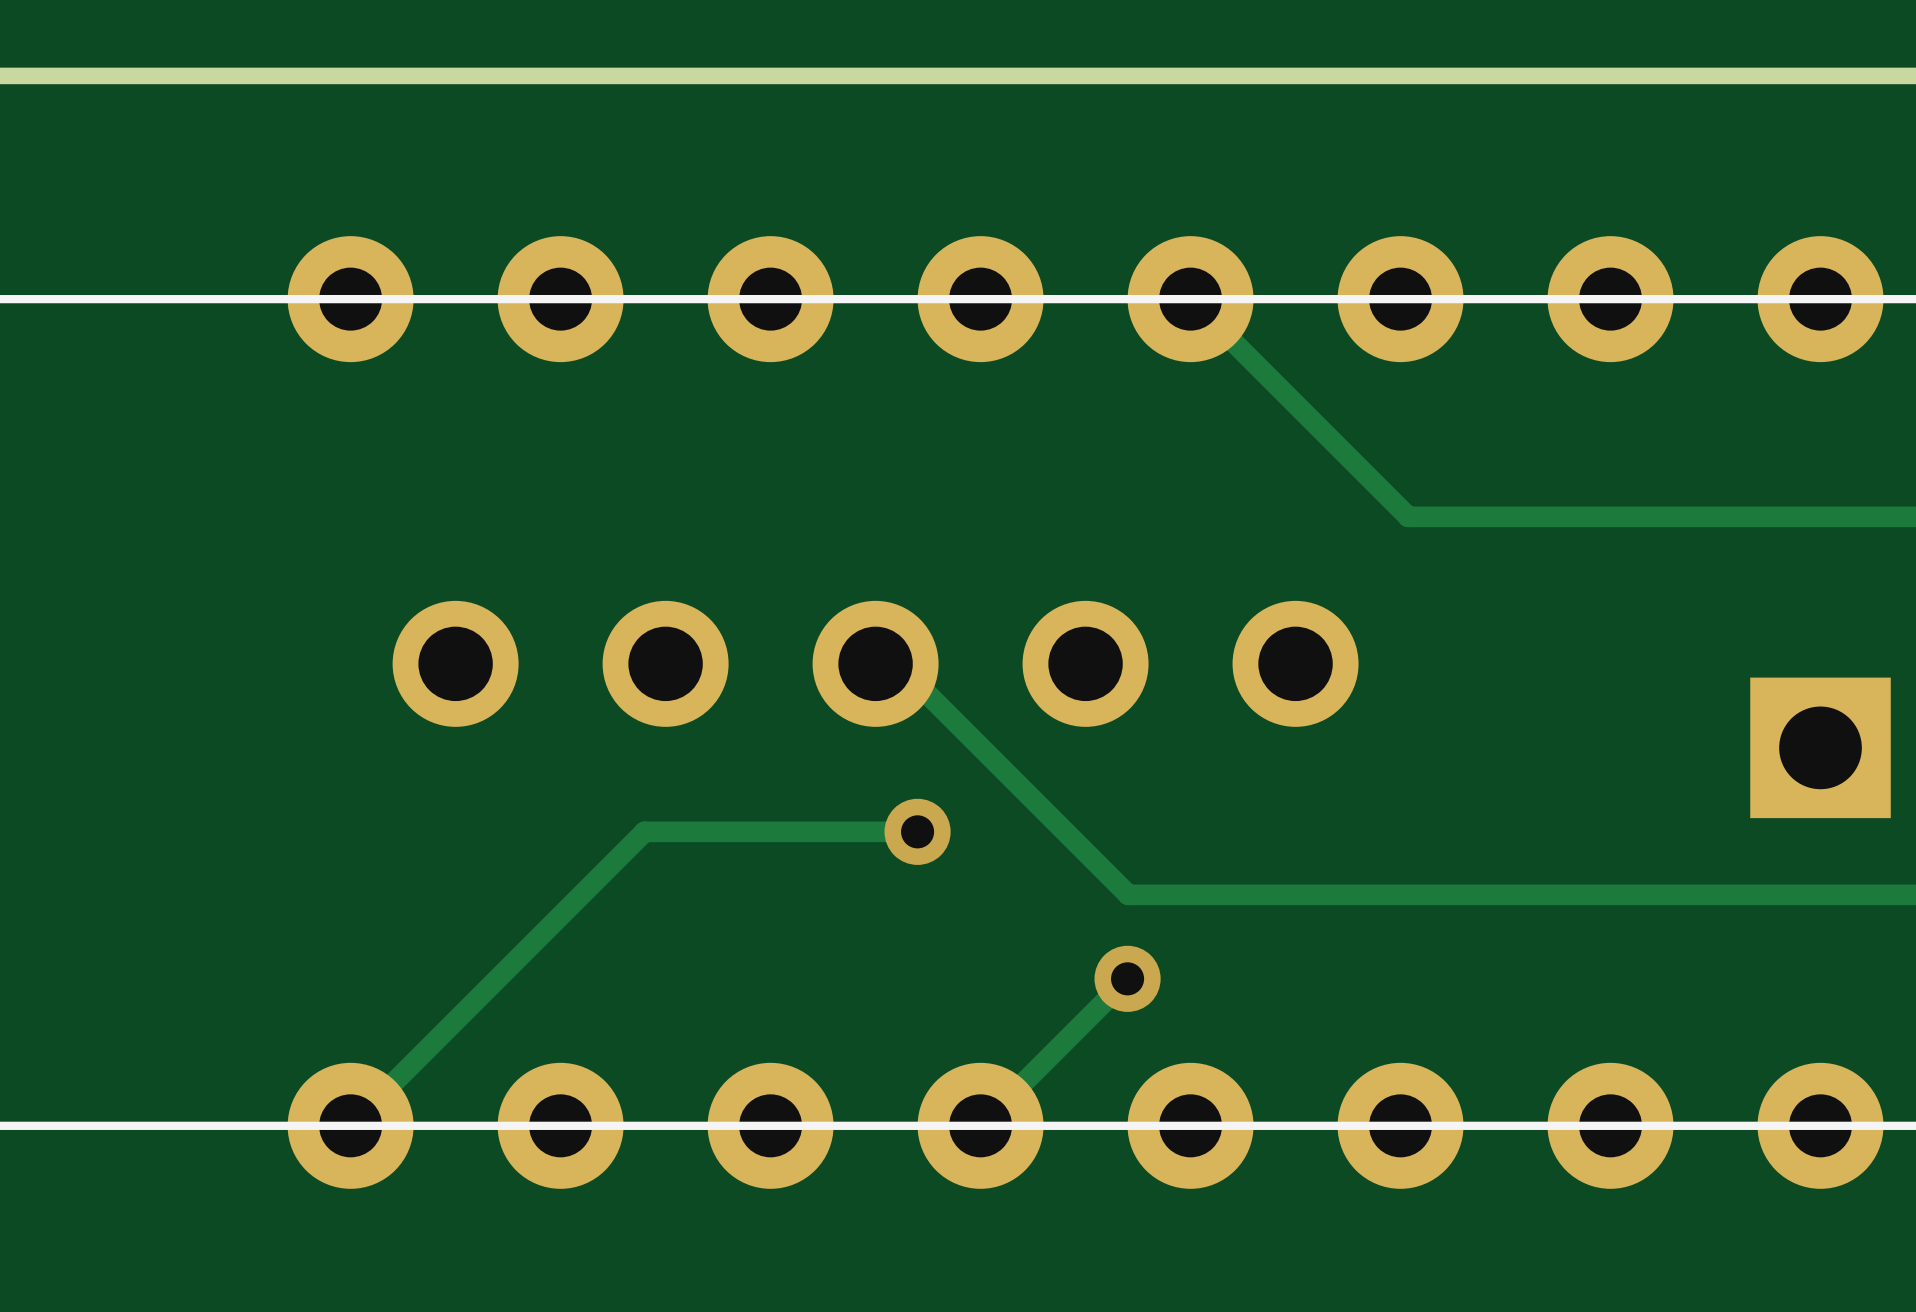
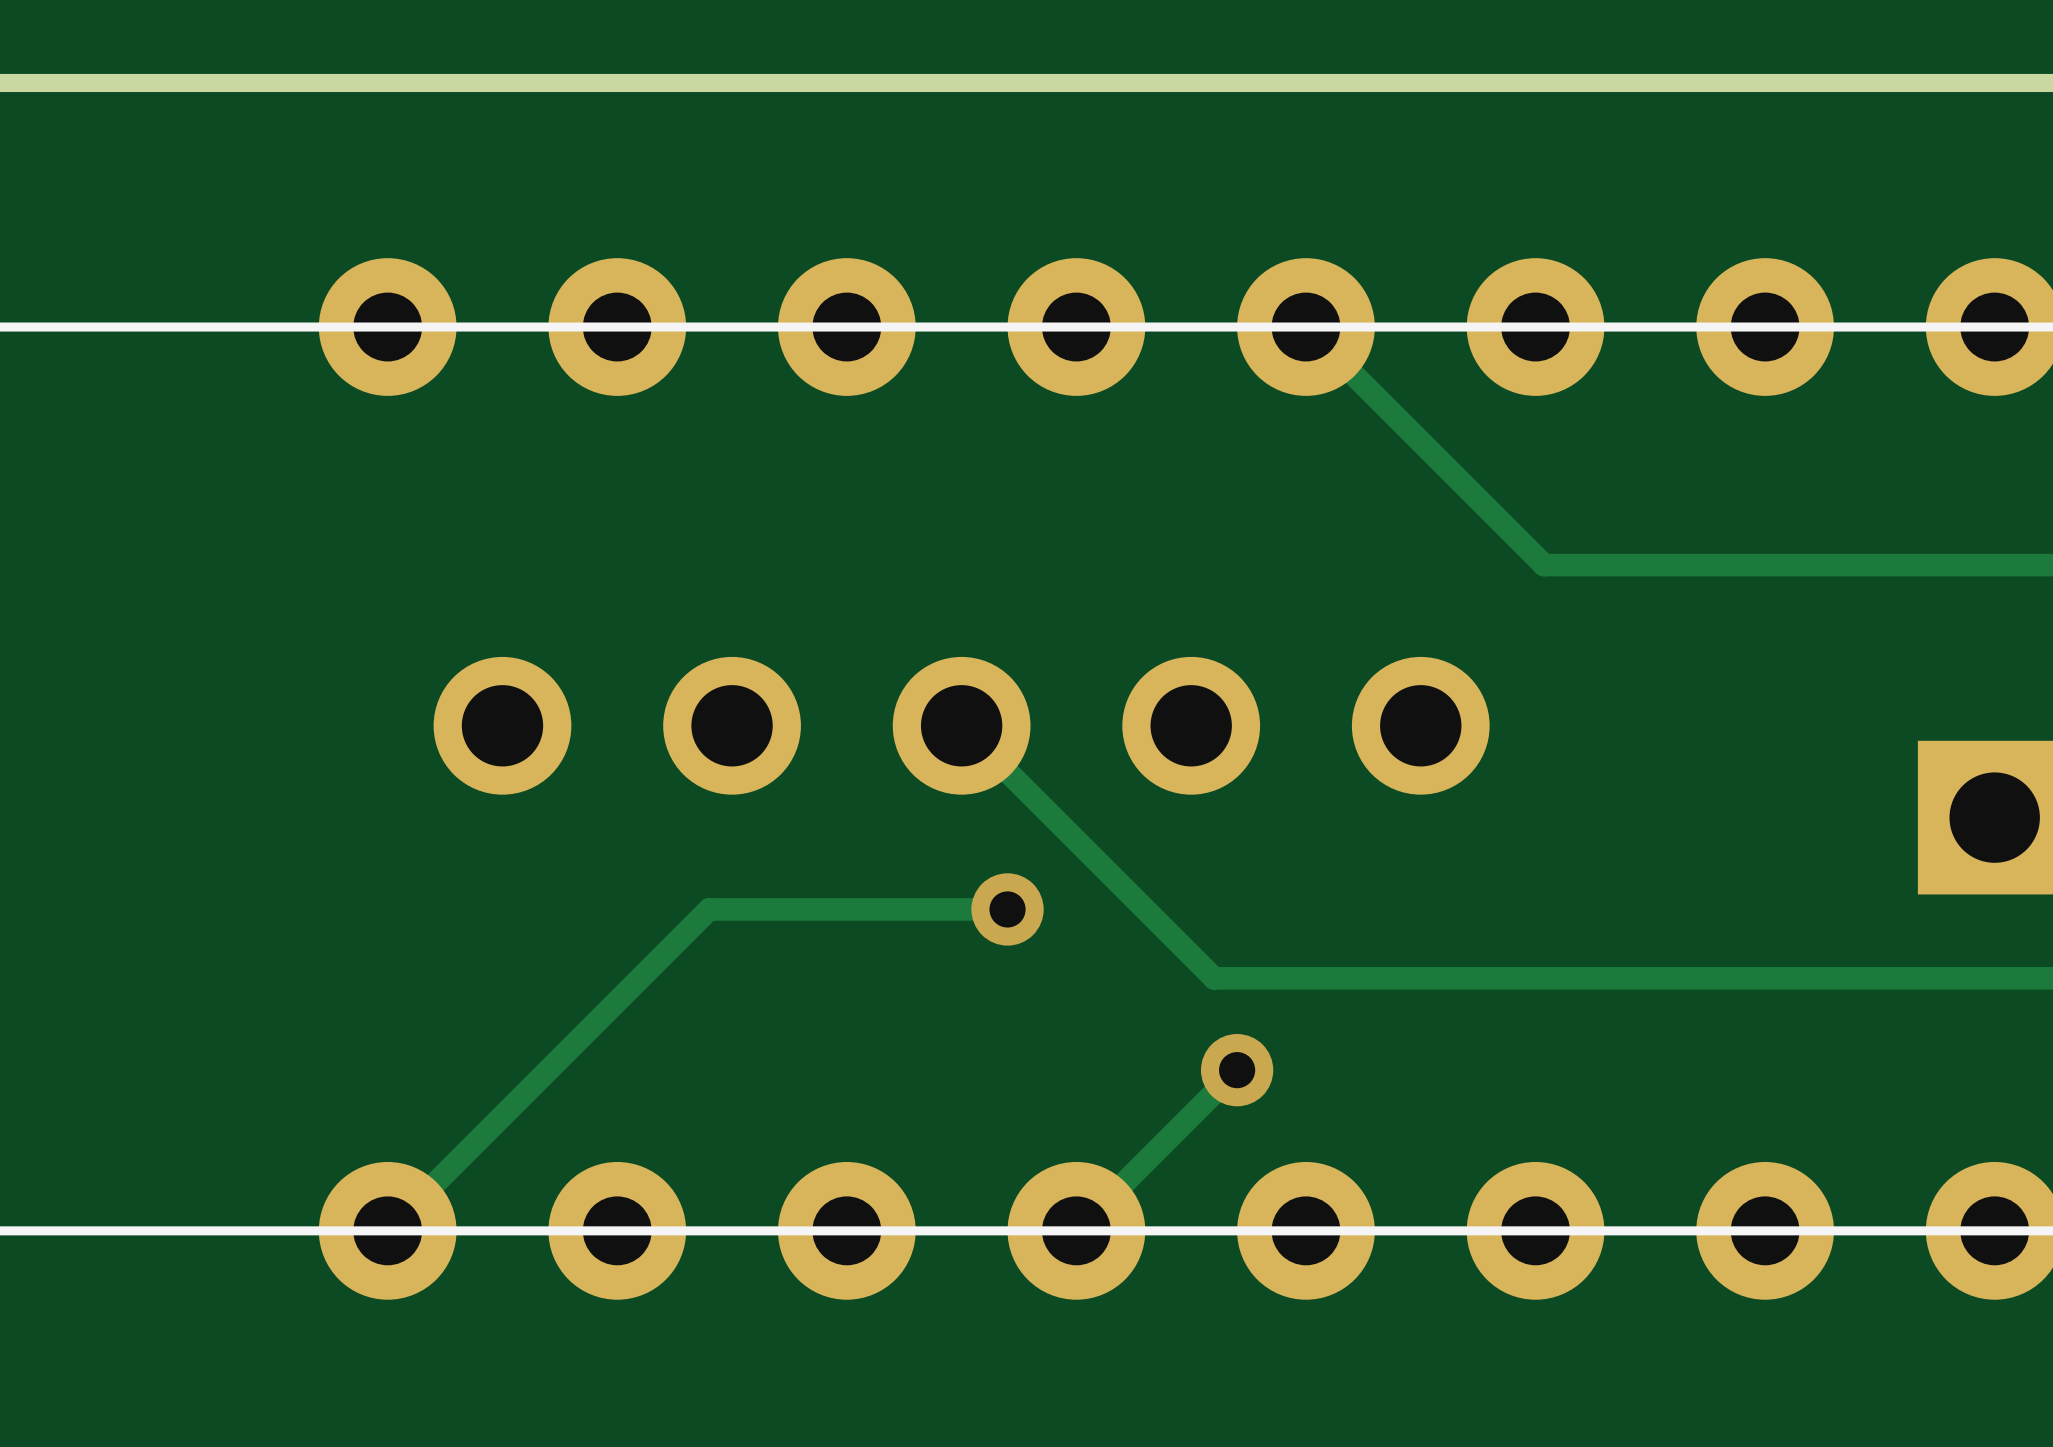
track: (875, 663) (897, 663) (1128, 894) -> (961, 725) (1214, 978) (1237, 978)

